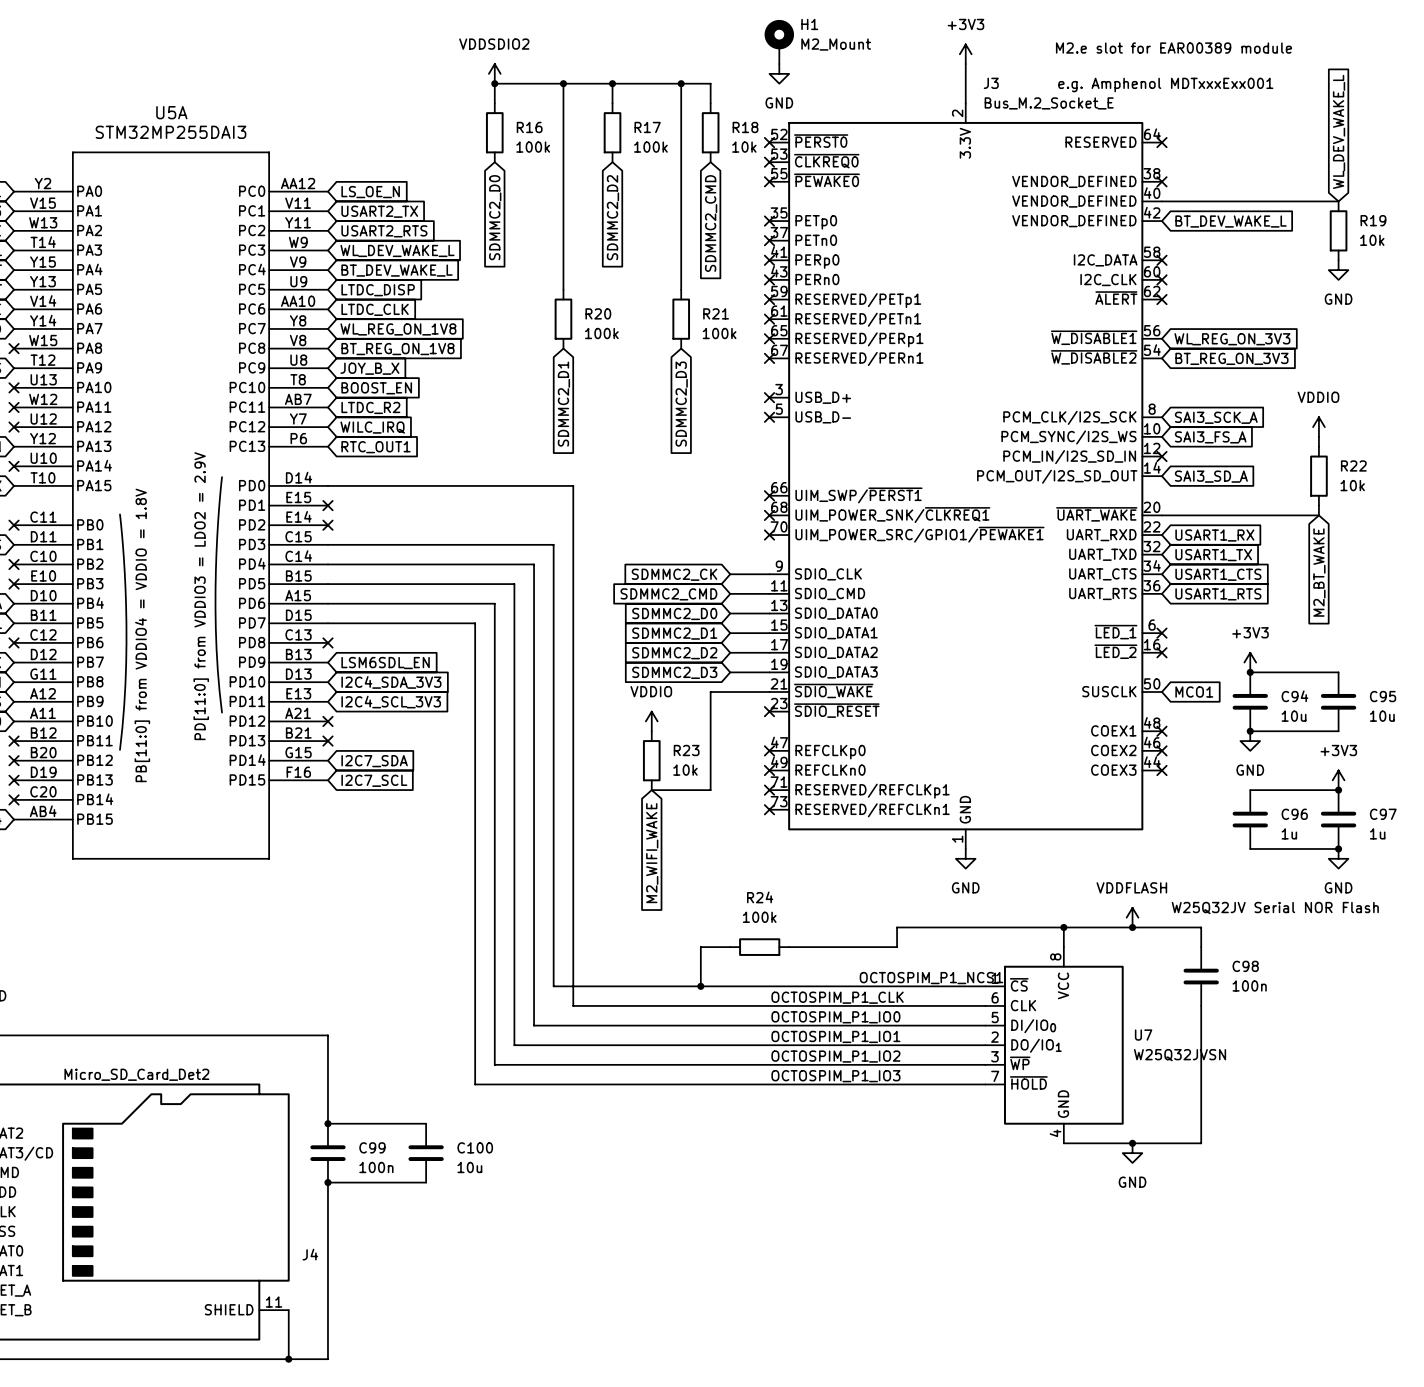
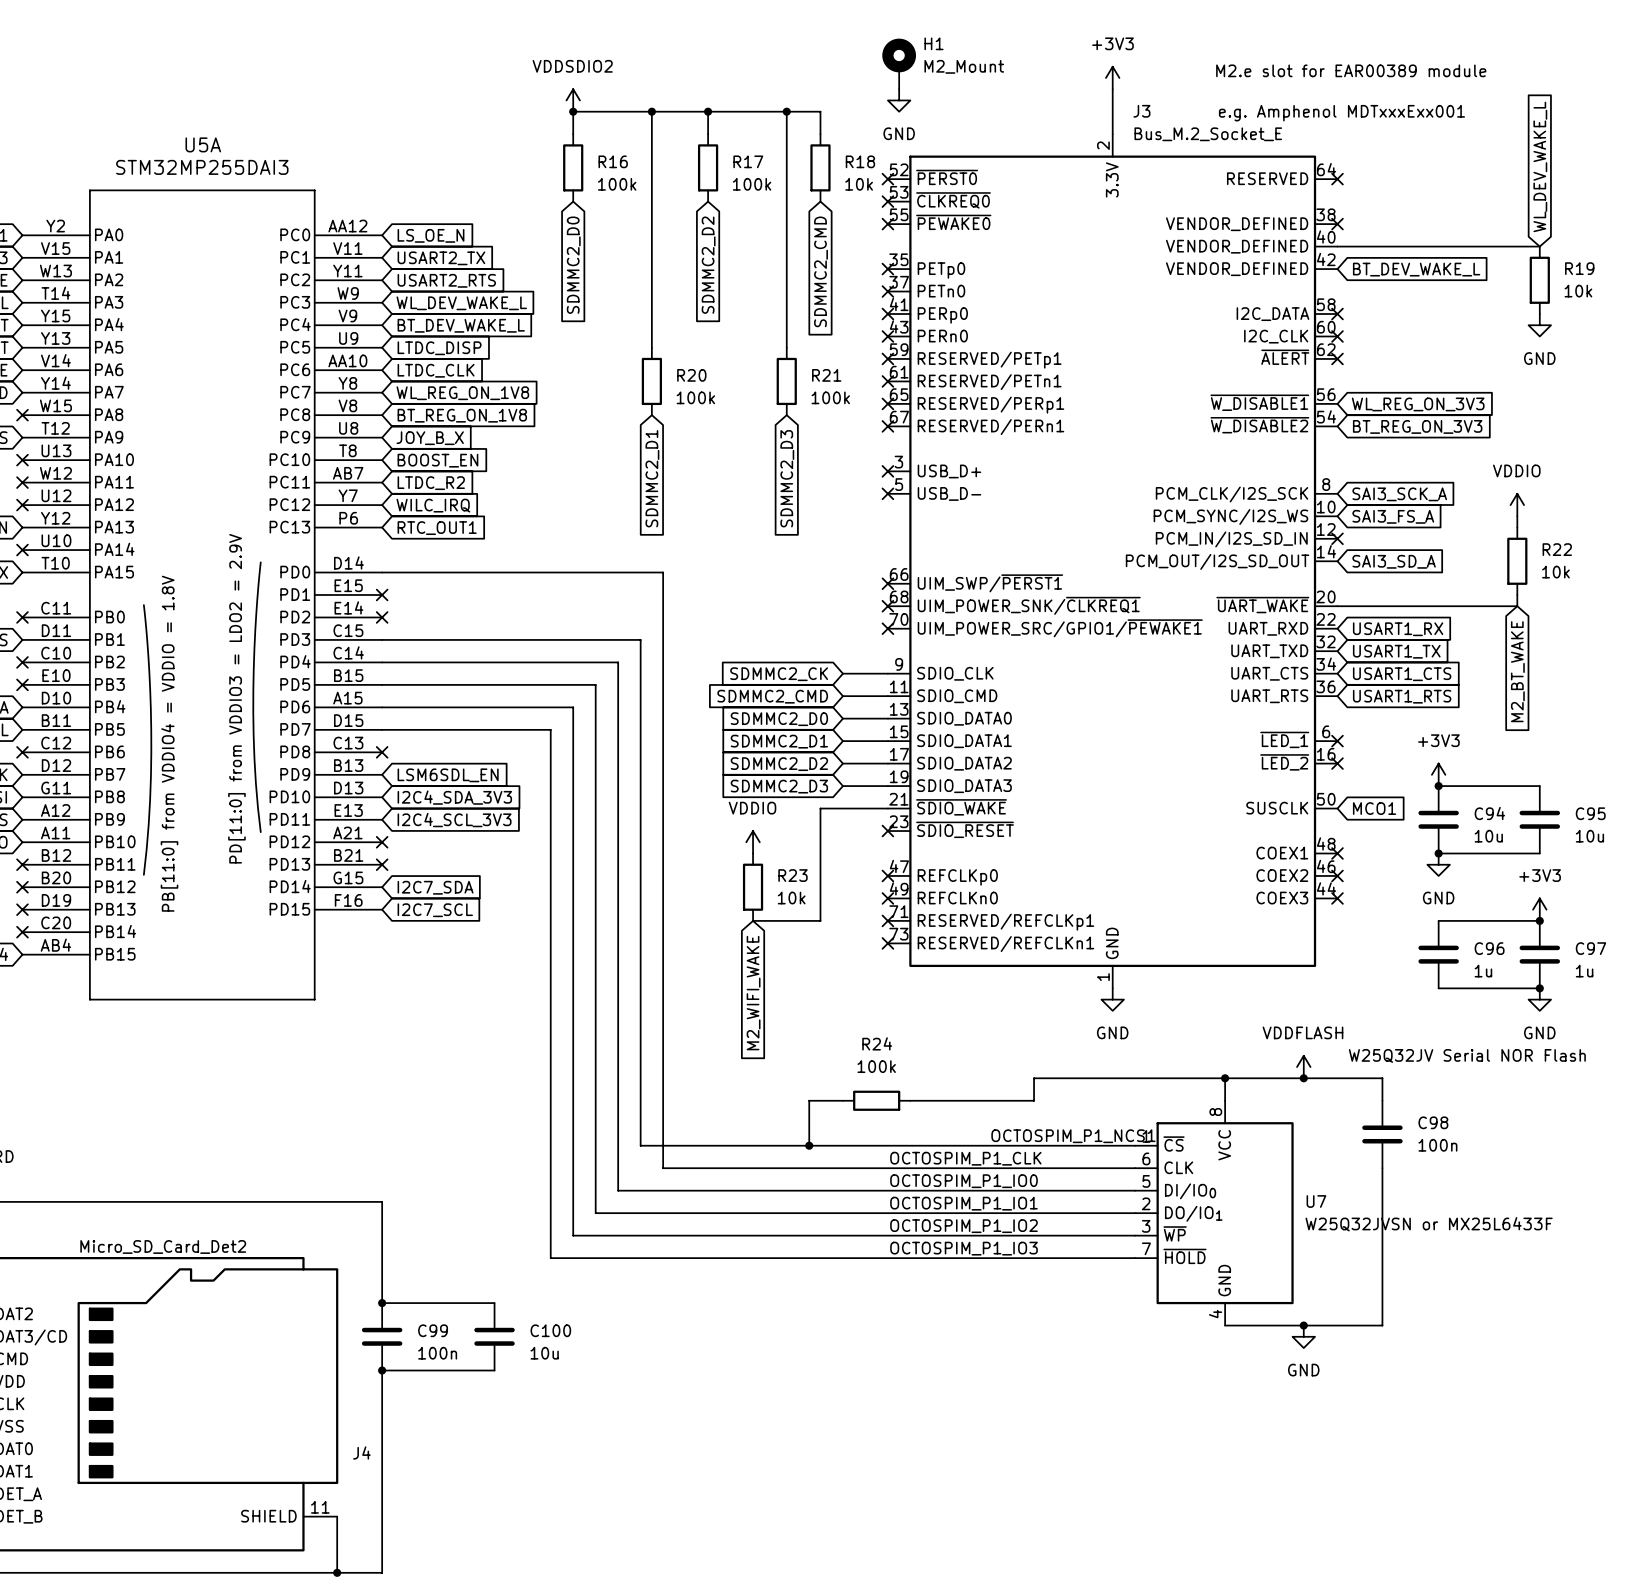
U7 value: W25Q32JVSN (1180, 1055) -> W25Q32JVSN or MX25L6433F (1429, 1224)

